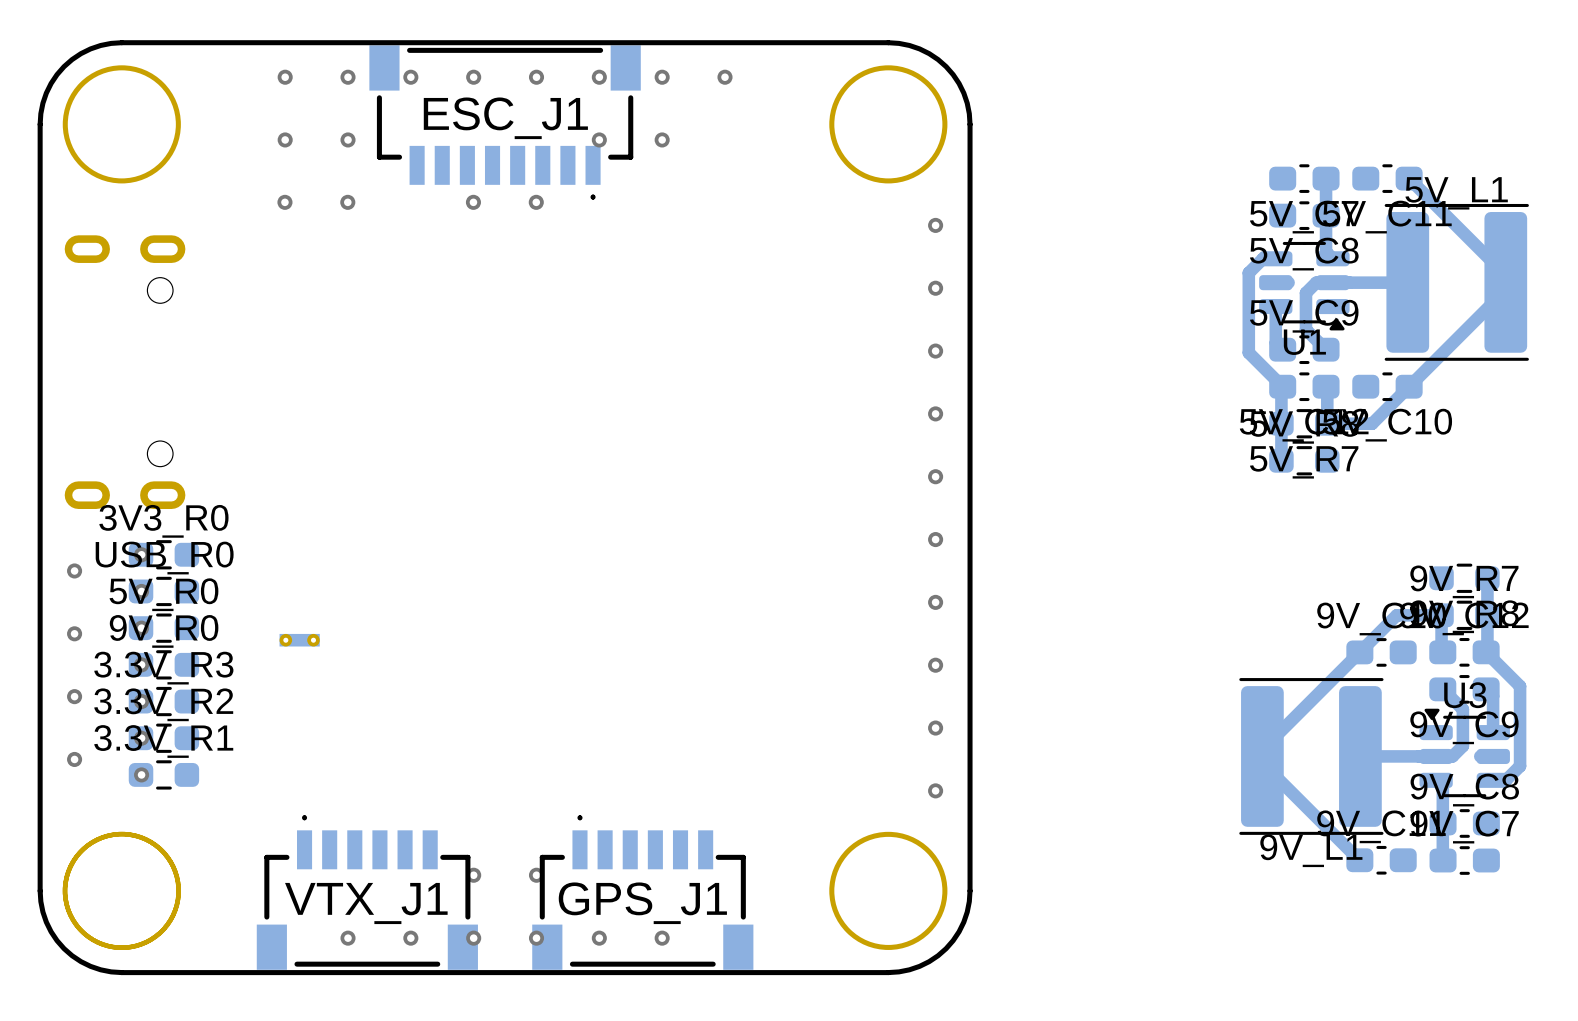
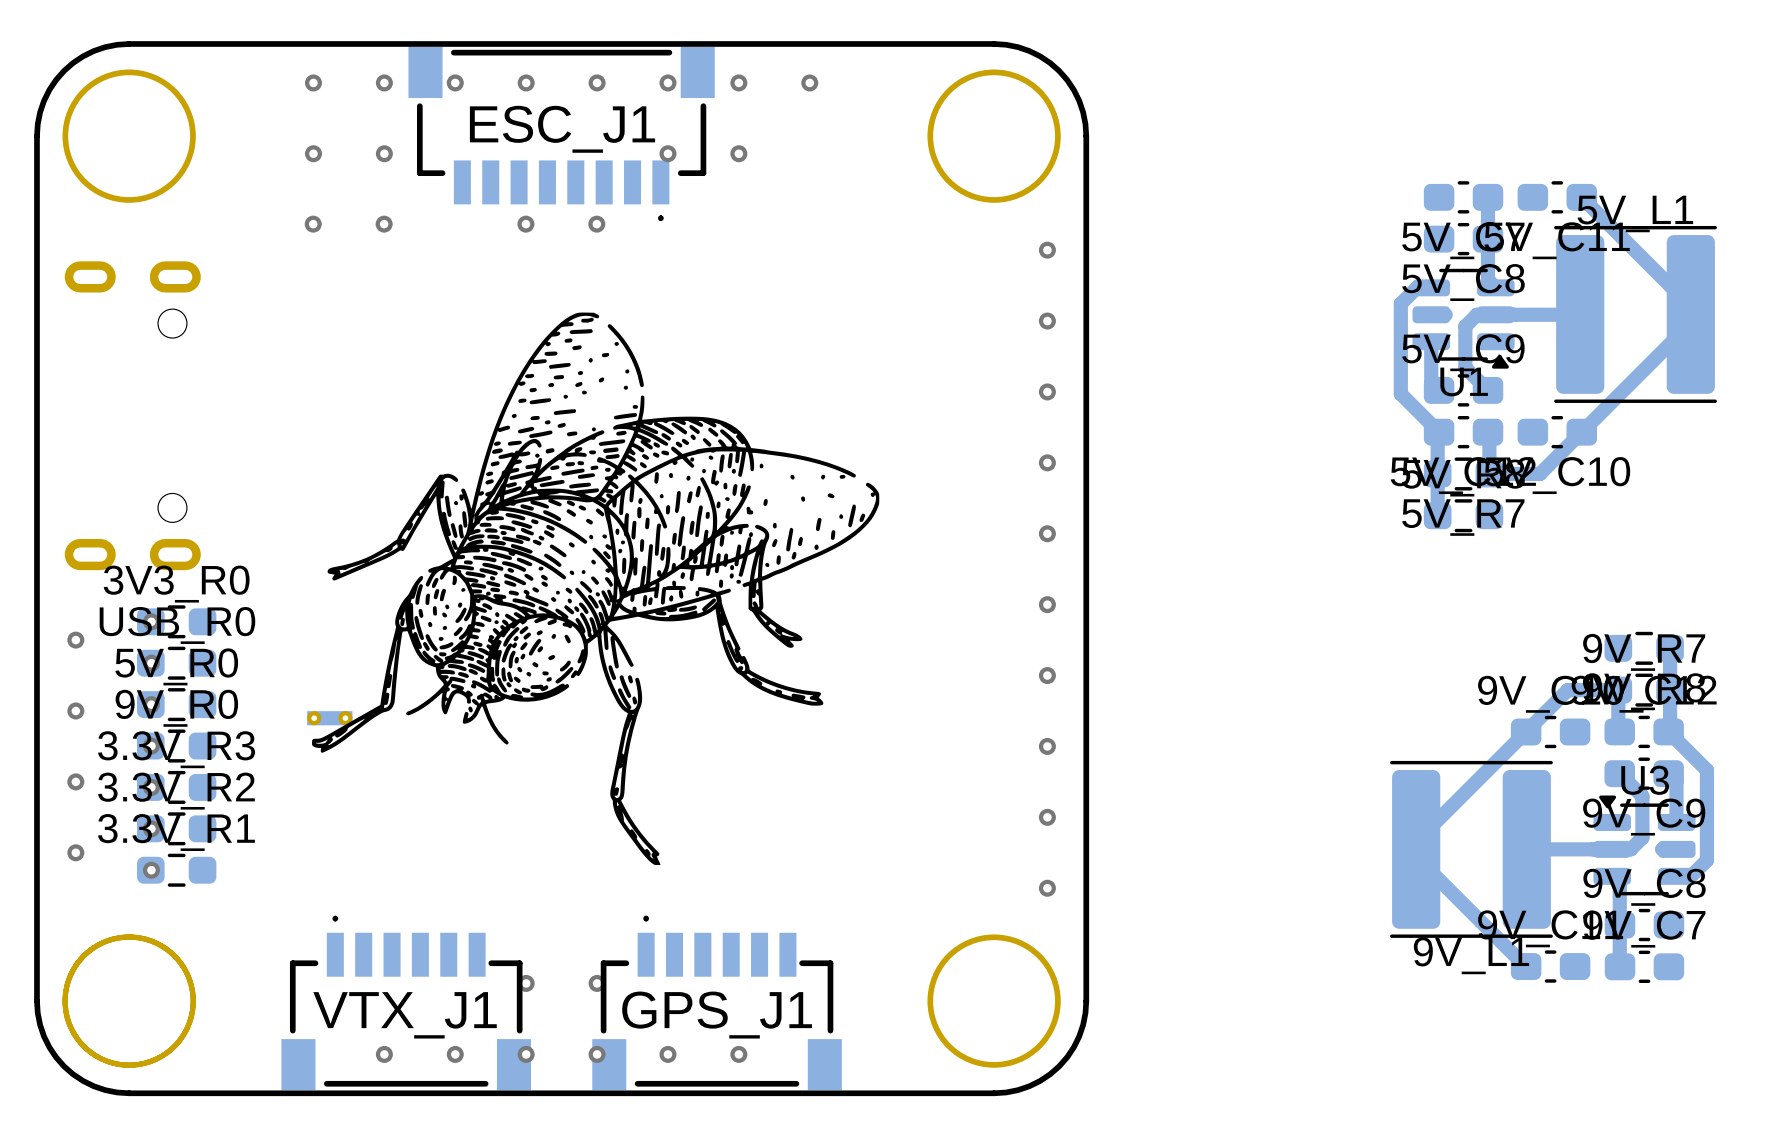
drawing: none -> [312, 312, 880, 866]

